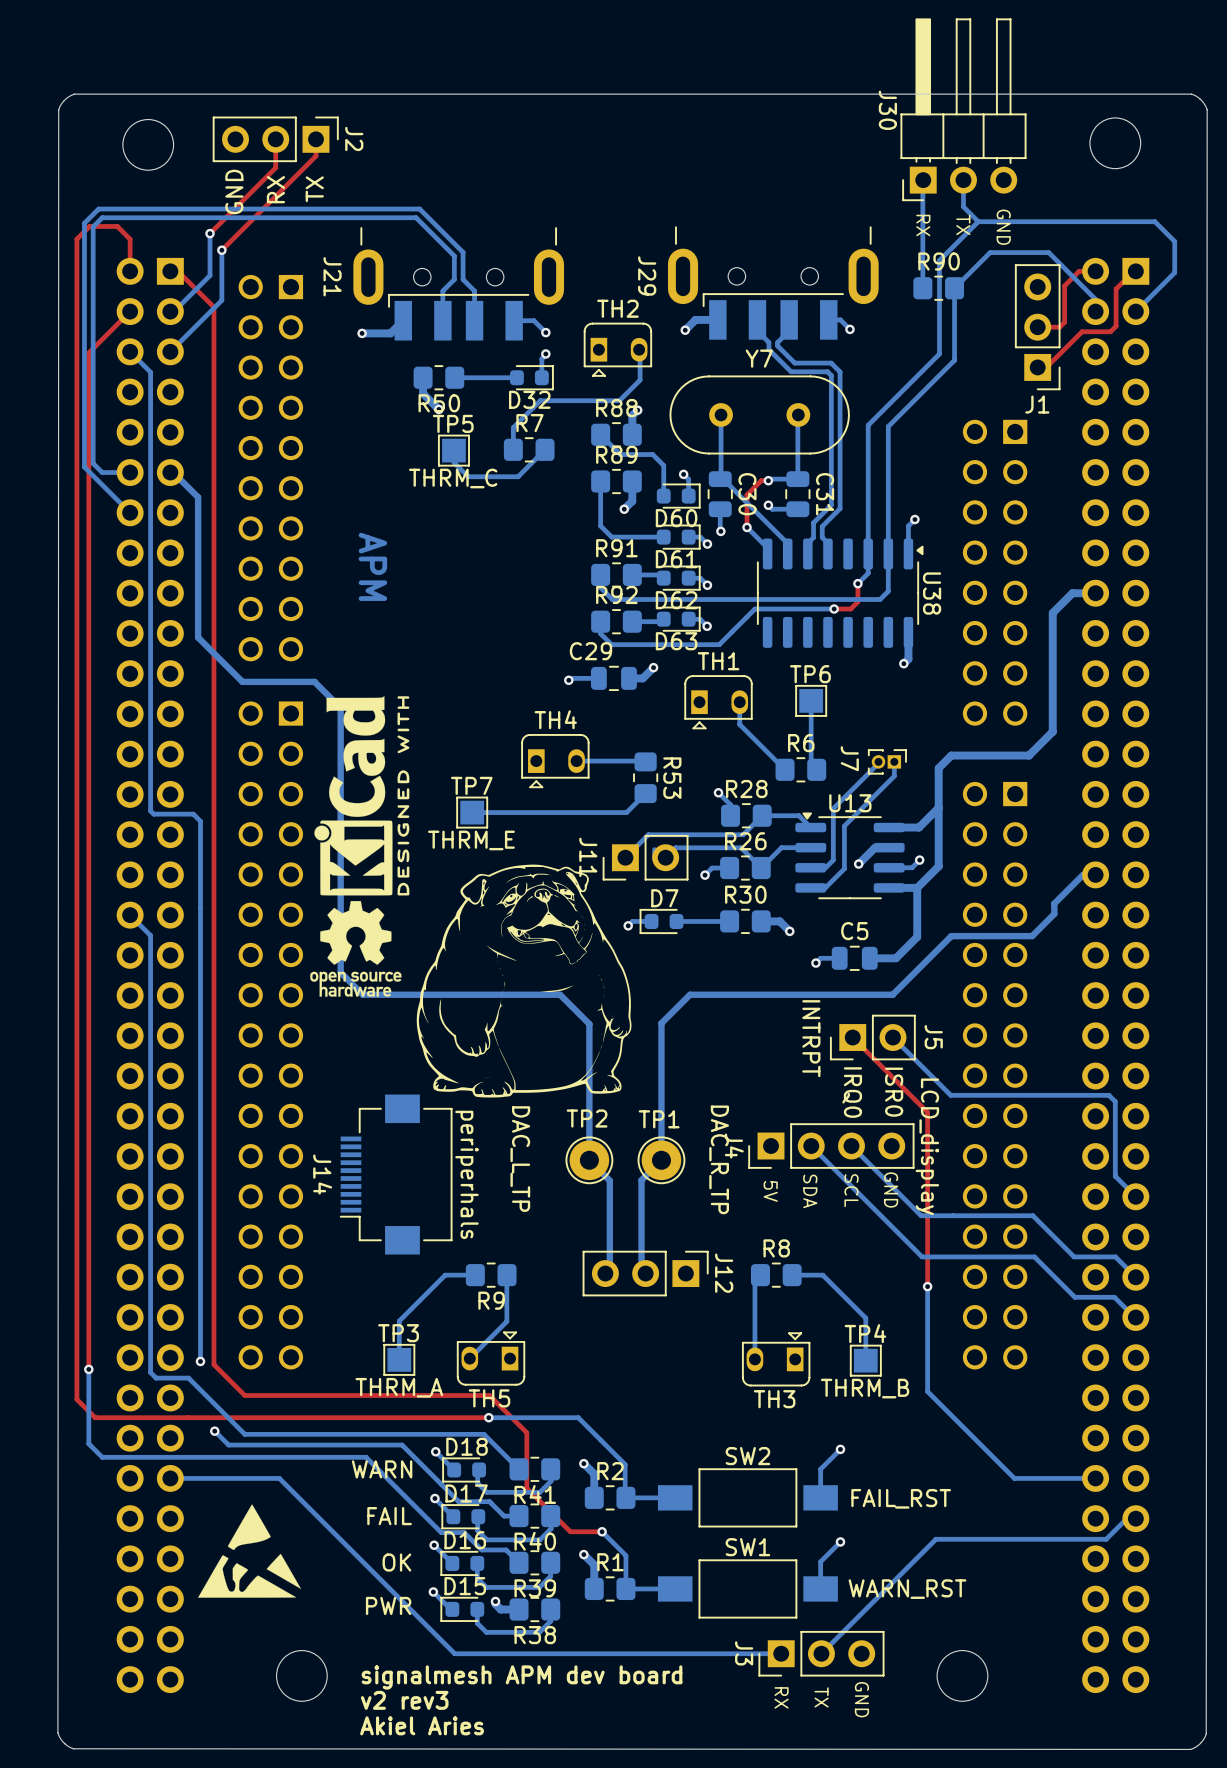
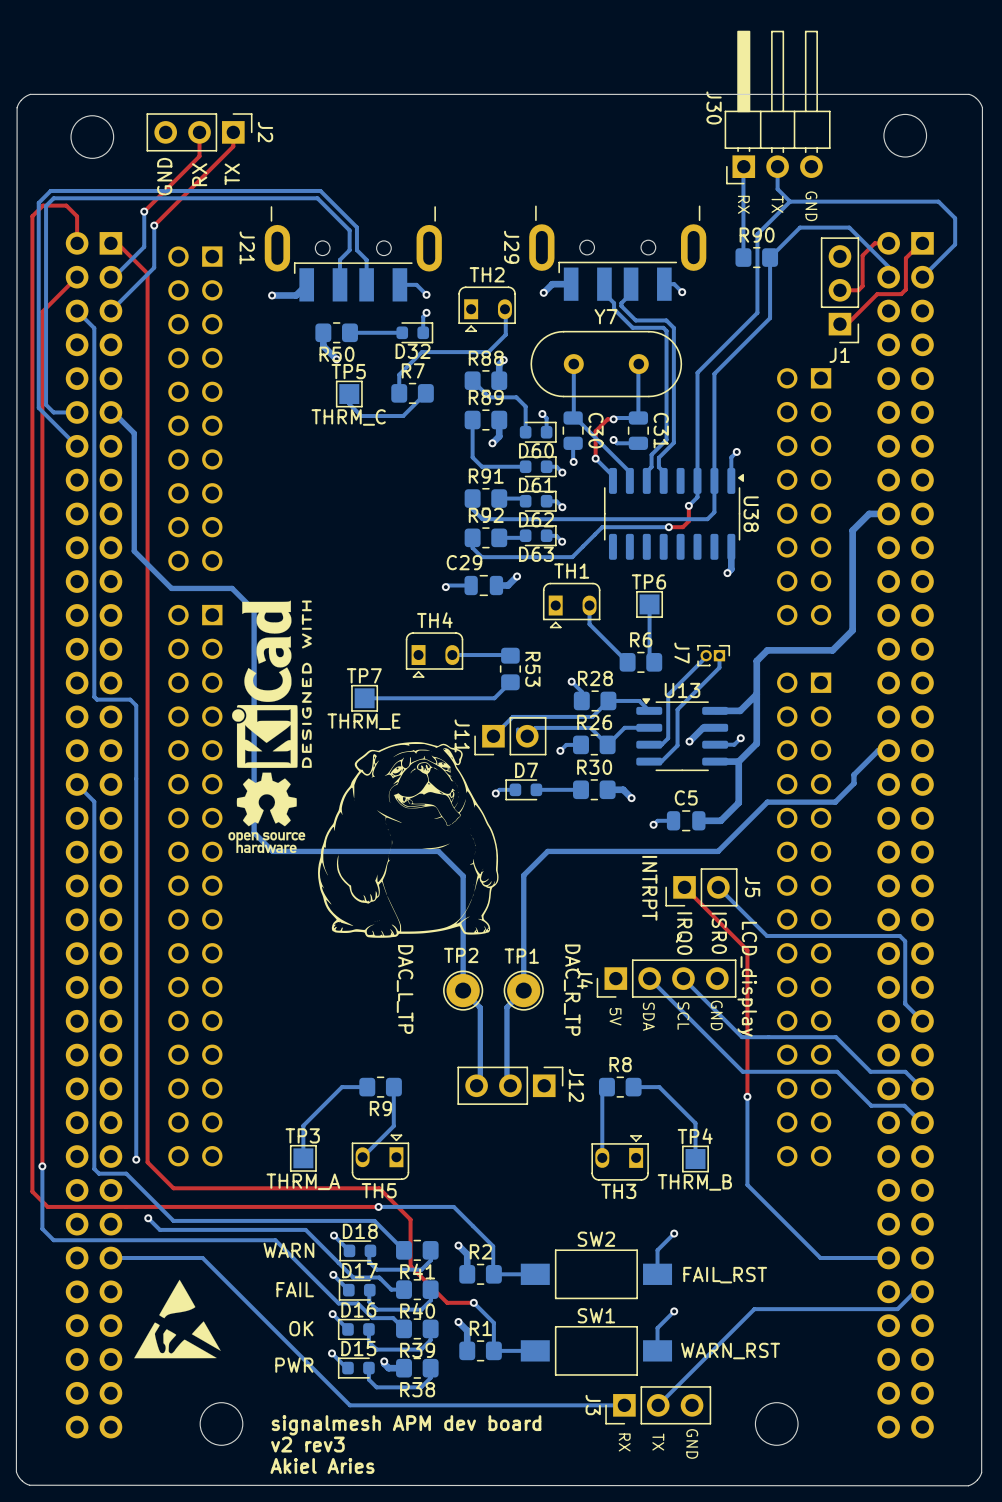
text: APM (372, 566) -> none
J14: periperhals (396, 1174) -> none

